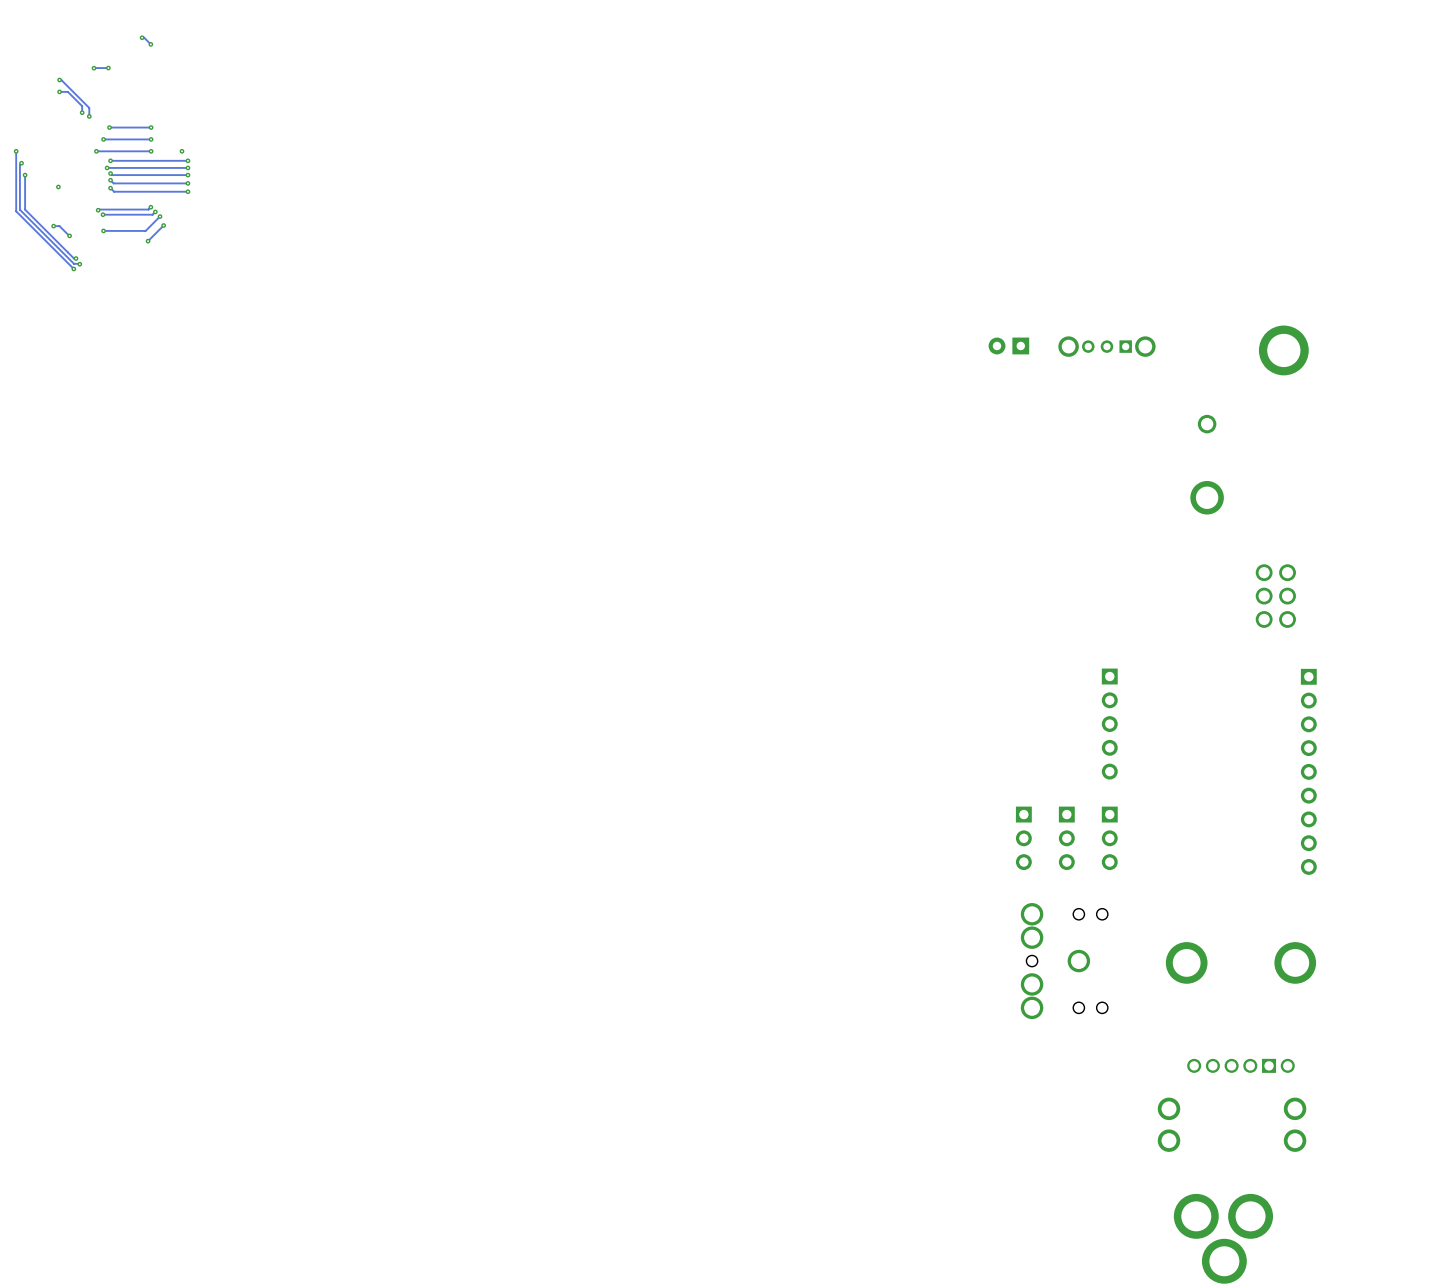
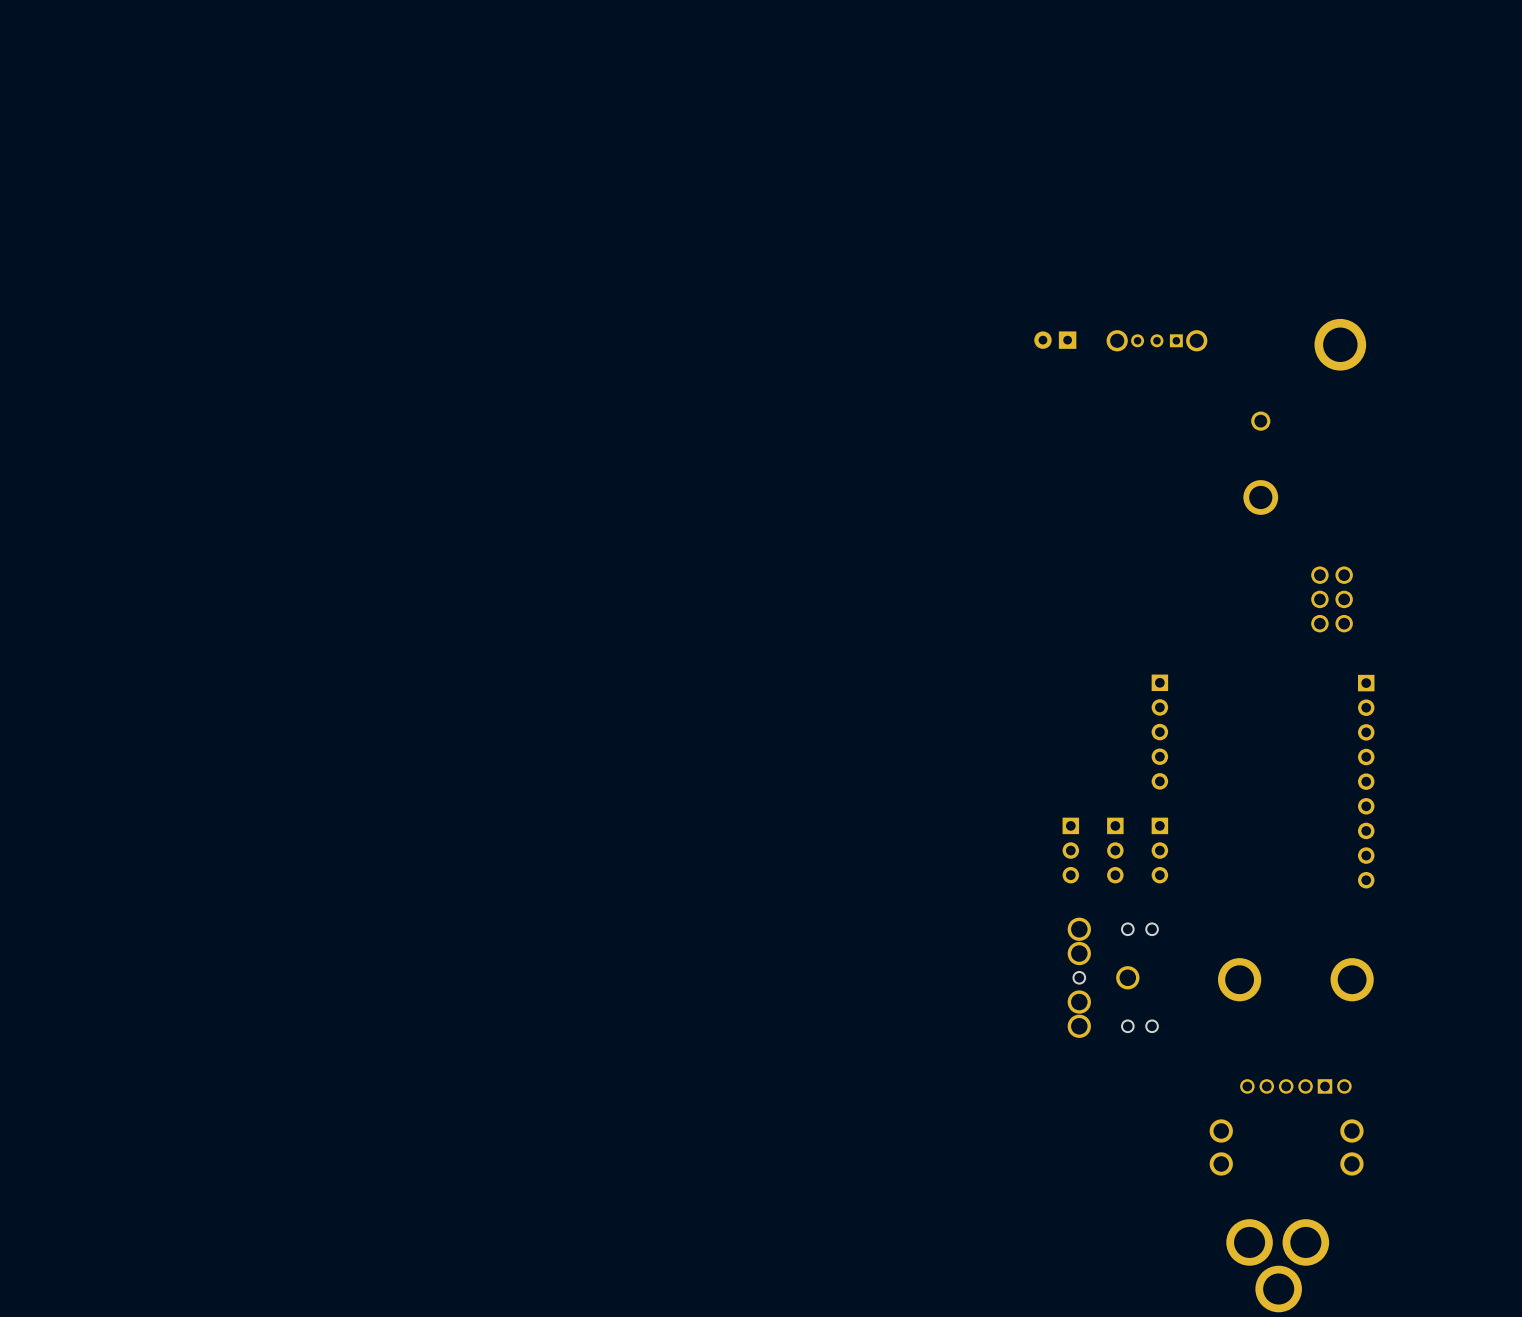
track: (142, 37) (150, 44) -> none
via: (142, 37) -> none
via: (150, 44) -> none
via: (93, 68) -> none
track: (108, 68) (93, 68) -> none
via: (108, 68) -> none
track: (59, 80) (89, 107) (89, 116) -> none
via: (59, 80) -> none
track: (59, 91) (67, 91) (82, 106) (82, 112) -> none
via: (59, 91) -> none
via: (82, 112) -> none
via: (89, 116) -> none
via: (109, 127) -> none
track: (151, 127) (109, 127) -> none
via: (151, 127) -> none
via: (103, 139) -> none
track: (151, 139) (103, 139) -> none
via: (151, 139) -> none
track: (16, 151) (16, 211) (73, 268) -> none
via: (16, 151) -> none
via: (96, 151) -> none
track: (151, 151) (96, 151) -> none
via: (151, 151) -> none
via: (182, 151) -> none
via: (110, 160) -> none
track: (187, 160) (110, 160) -> none
via: (187, 160) -> none
track: (21, 163) (19, 164) (19, 209) (73, 263) (79, 264) -> none
via: (21, 163) -> none
via: (107, 167) -> none
track: (187, 167) (107, 167) -> none
via: (187, 167) -> none
track: (110, 173) (112, 175) (187, 175) -> none
via: (110, 173) -> none
track: (25, 175) (25, 209) (75, 258) -> none
via: (25, 175) -> none
via: (187, 175) -> none
track: (110, 180) (113, 183) (187, 183) -> none
via: (110, 180) -> none
via: (187, 183) -> none
via: (58, 186) -> none
track: (110, 188) (114, 191) (187, 191) -> none
via: (110, 188) -> none
via: (187, 191) -> none
track: (150, 207) (148, 209) (98, 210) -> none
via: (150, 207) -> none
via: (98, 210) -> none
track: (155, 211) (152, 214) (102, 214) -> none
via: (155, 211) -> none
via: (102, 214) -> none
track: (160, 216) (145, 230) (103, 230) -> none
via: (160, 216) -> none
track: (163, 225) (148, 241) -> none
via: (163, 225) -> none
track: (53, 226) (59, 226) (69, 235) -> none
via: (53, 226) -> none
via: (103, 230) -> none
via: (69, 235) -> none
via: (148, 241) -> none
via: (75, 258) -> none
via: (79, 264) -> none
via: (73, 268) -> none

